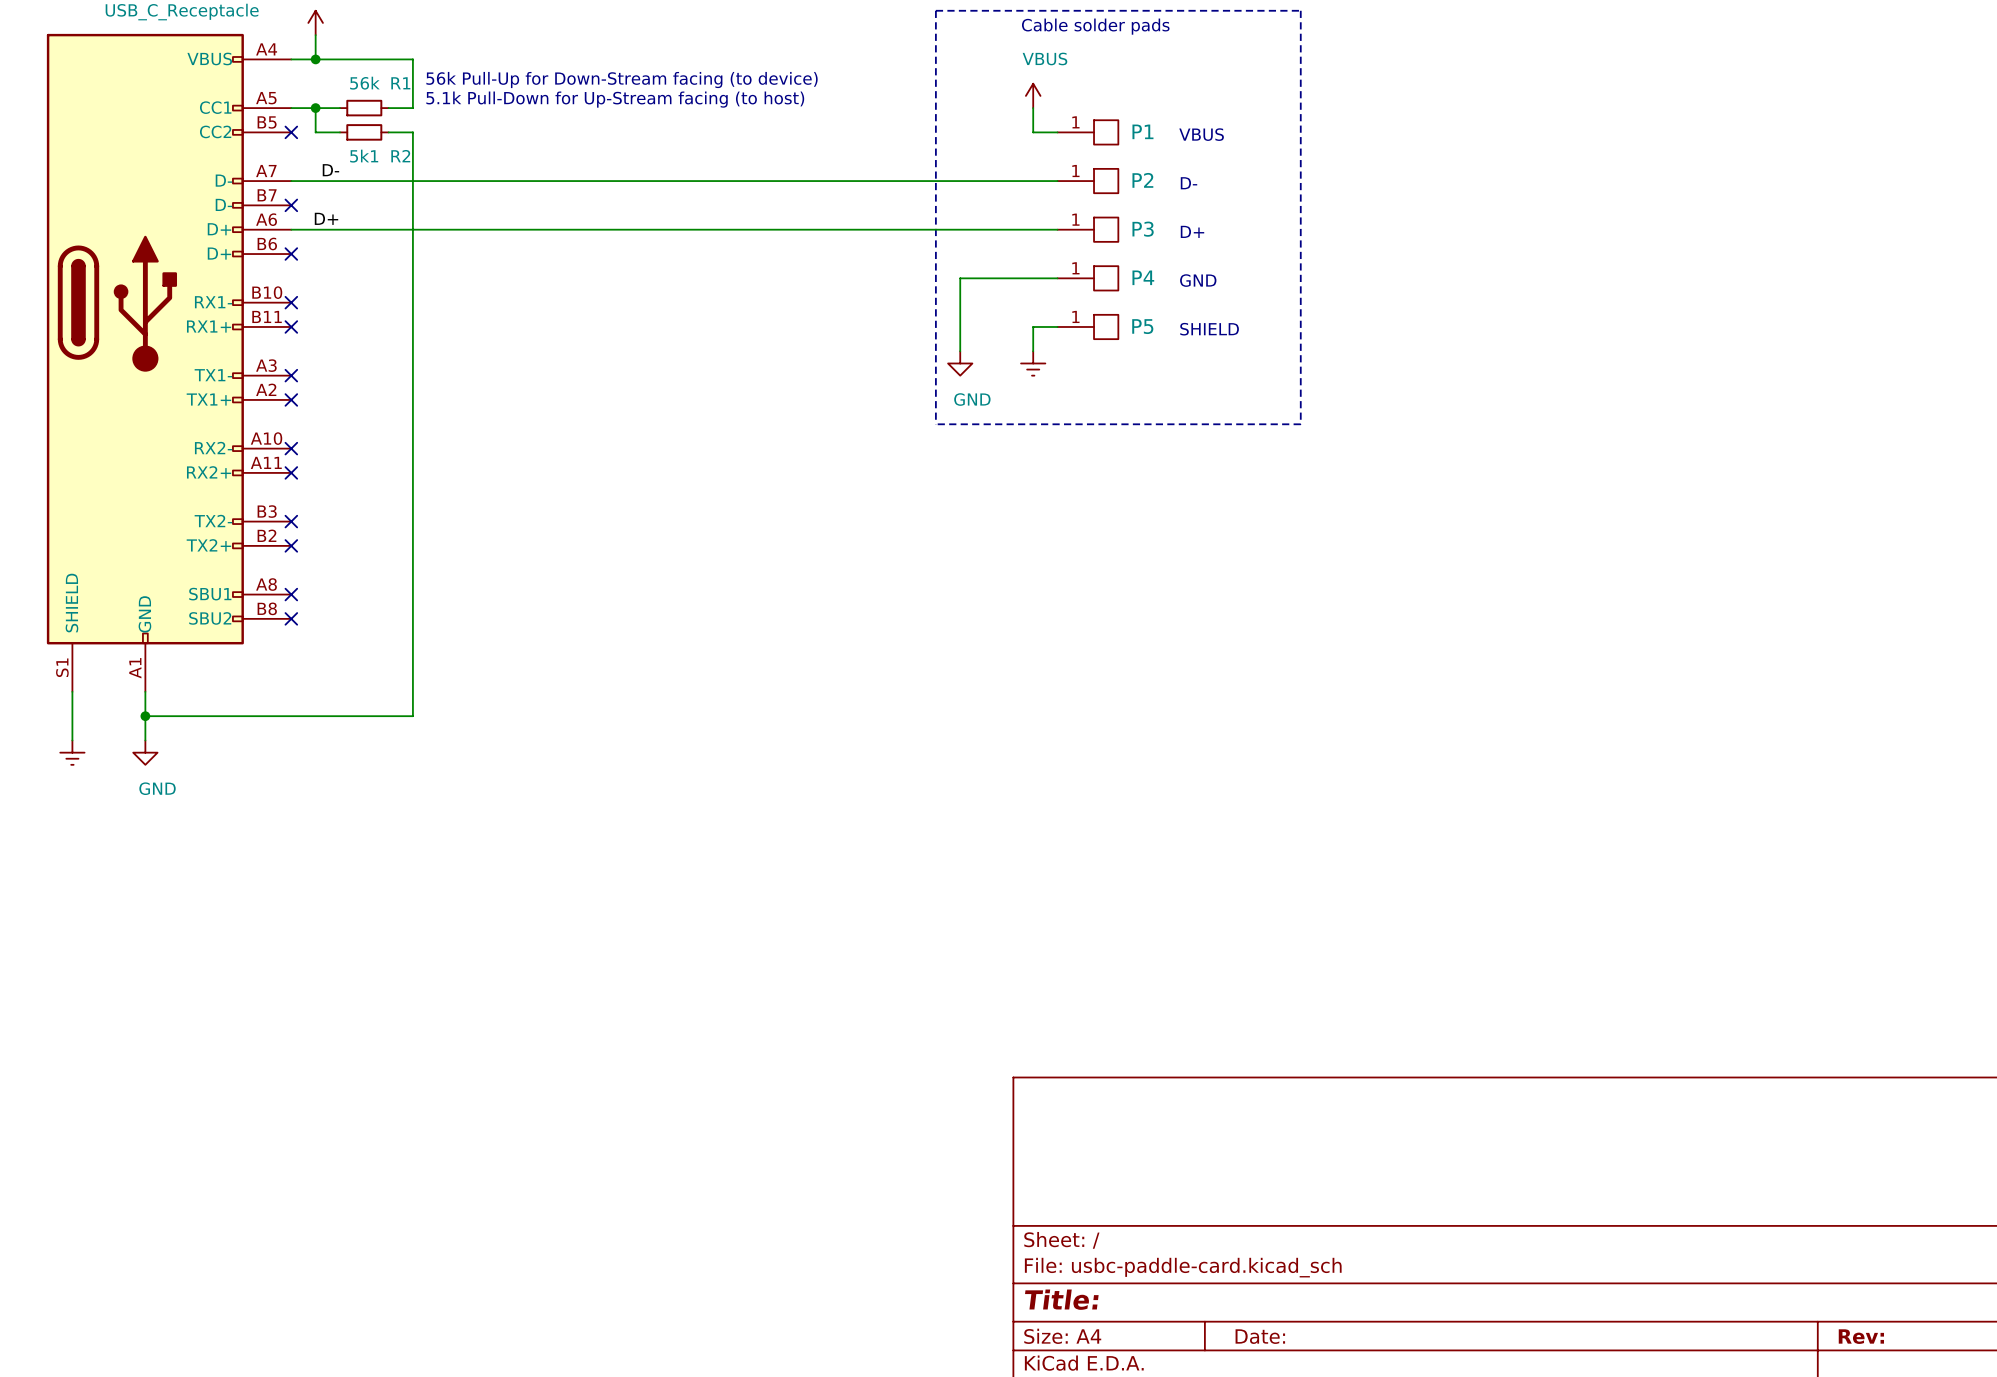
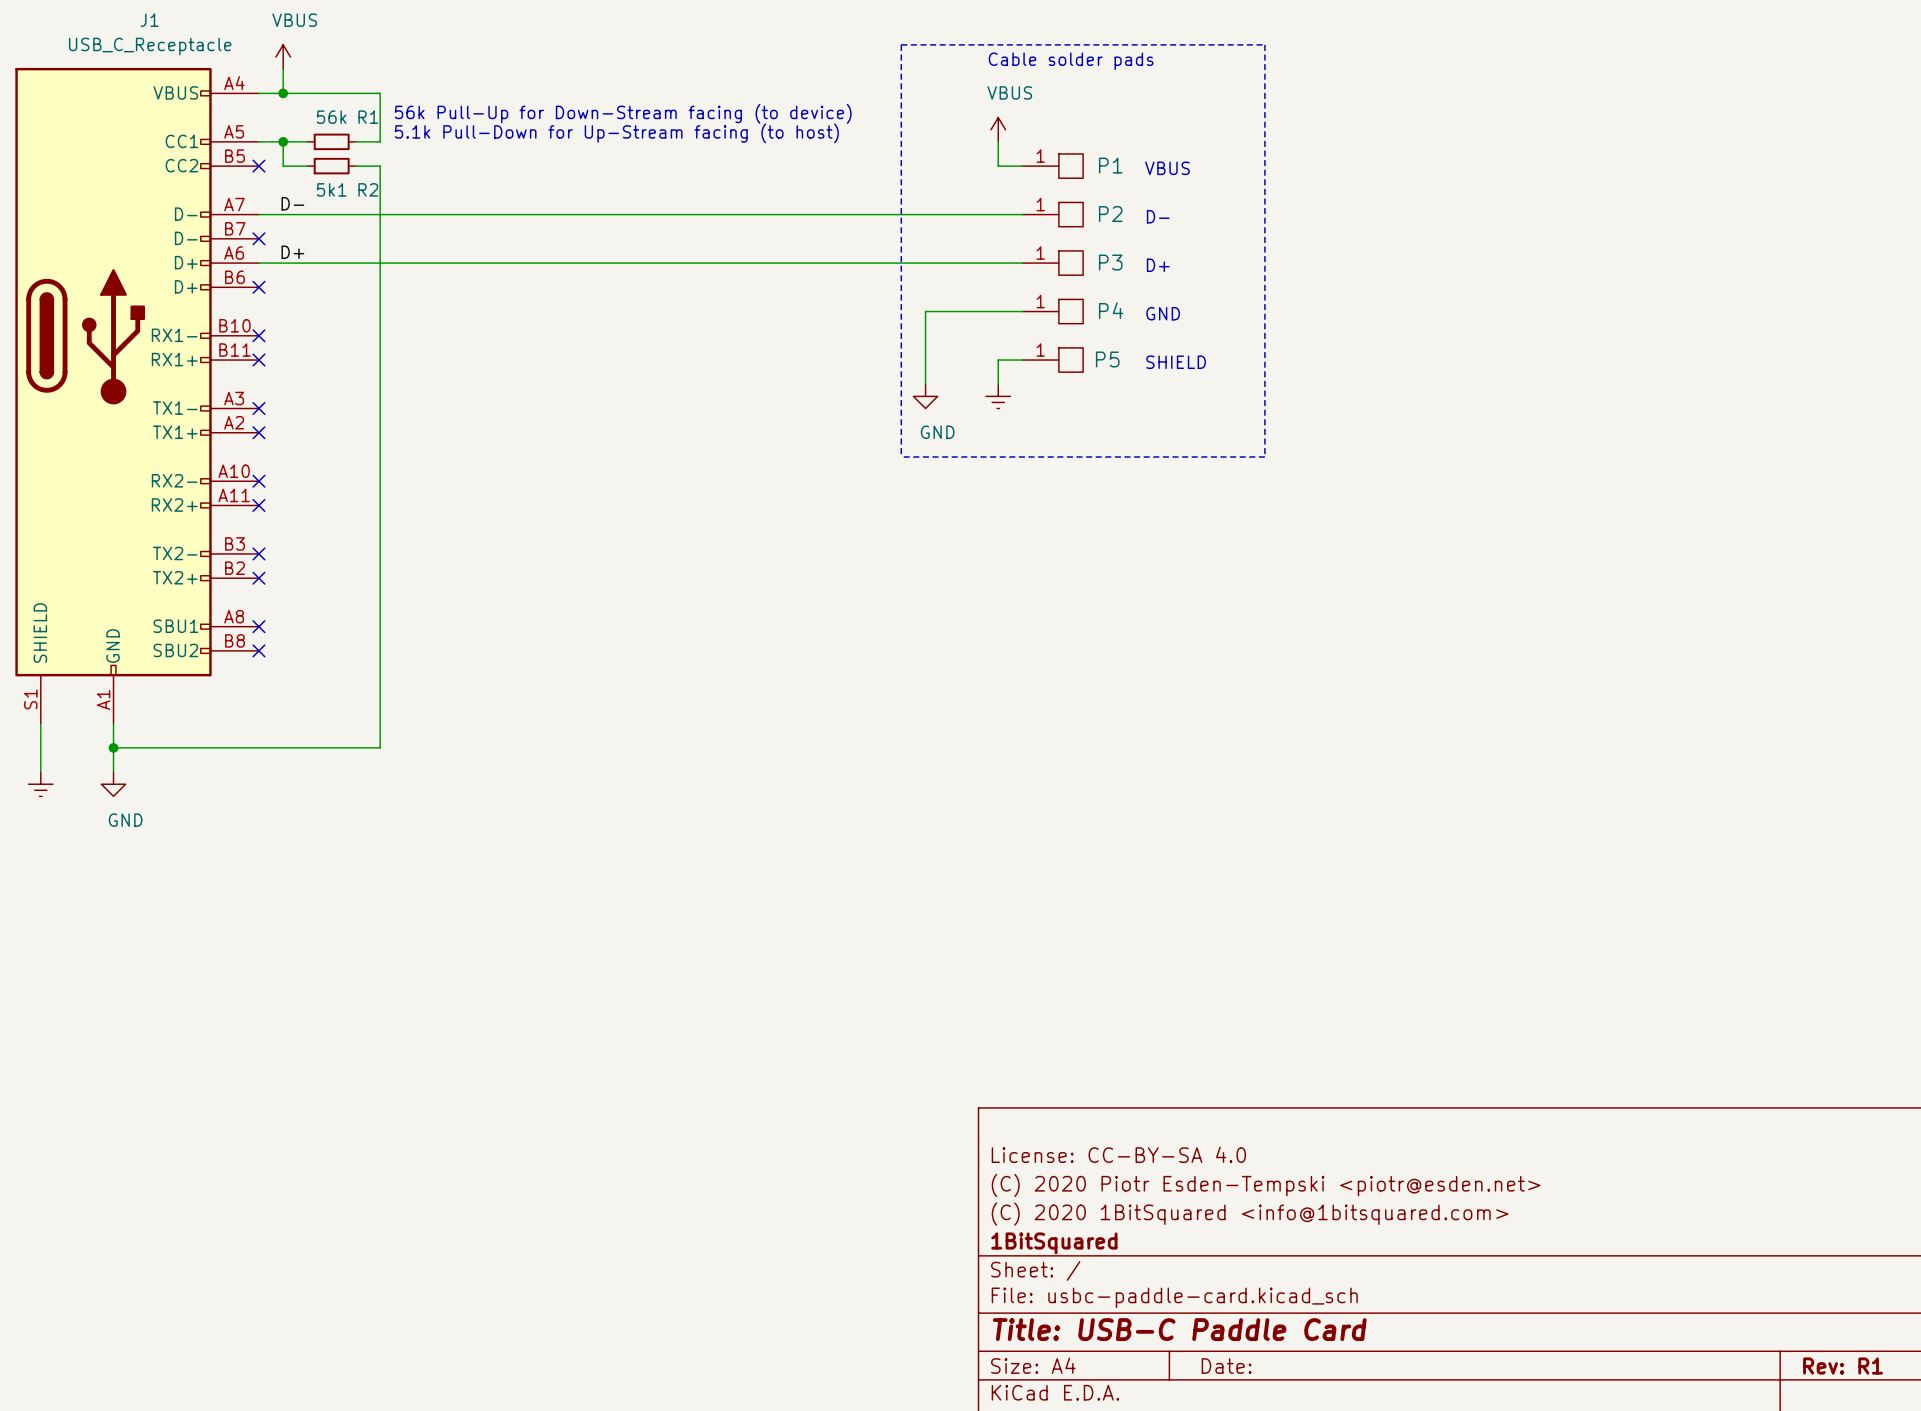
title block: none -> License: CC-BY-SA 4.0 (1118, 1154)
title block: none -> (C) 2020 Piotr Esden-Tempski <piotr@esden.net> (1266, 1185)
title block: none -> (C) 2020 1BitSquared <info@1bitsquared.com> (1250, 1214)
title block: none -> 1BitSquared (1054, 1243)
title block: Title: (1061, 1299) -> Title: USB-C Paddle Card (1179, 1329)
title block: Rev: (1861, 1336) -> Rev: R1 (1843, 1366)

